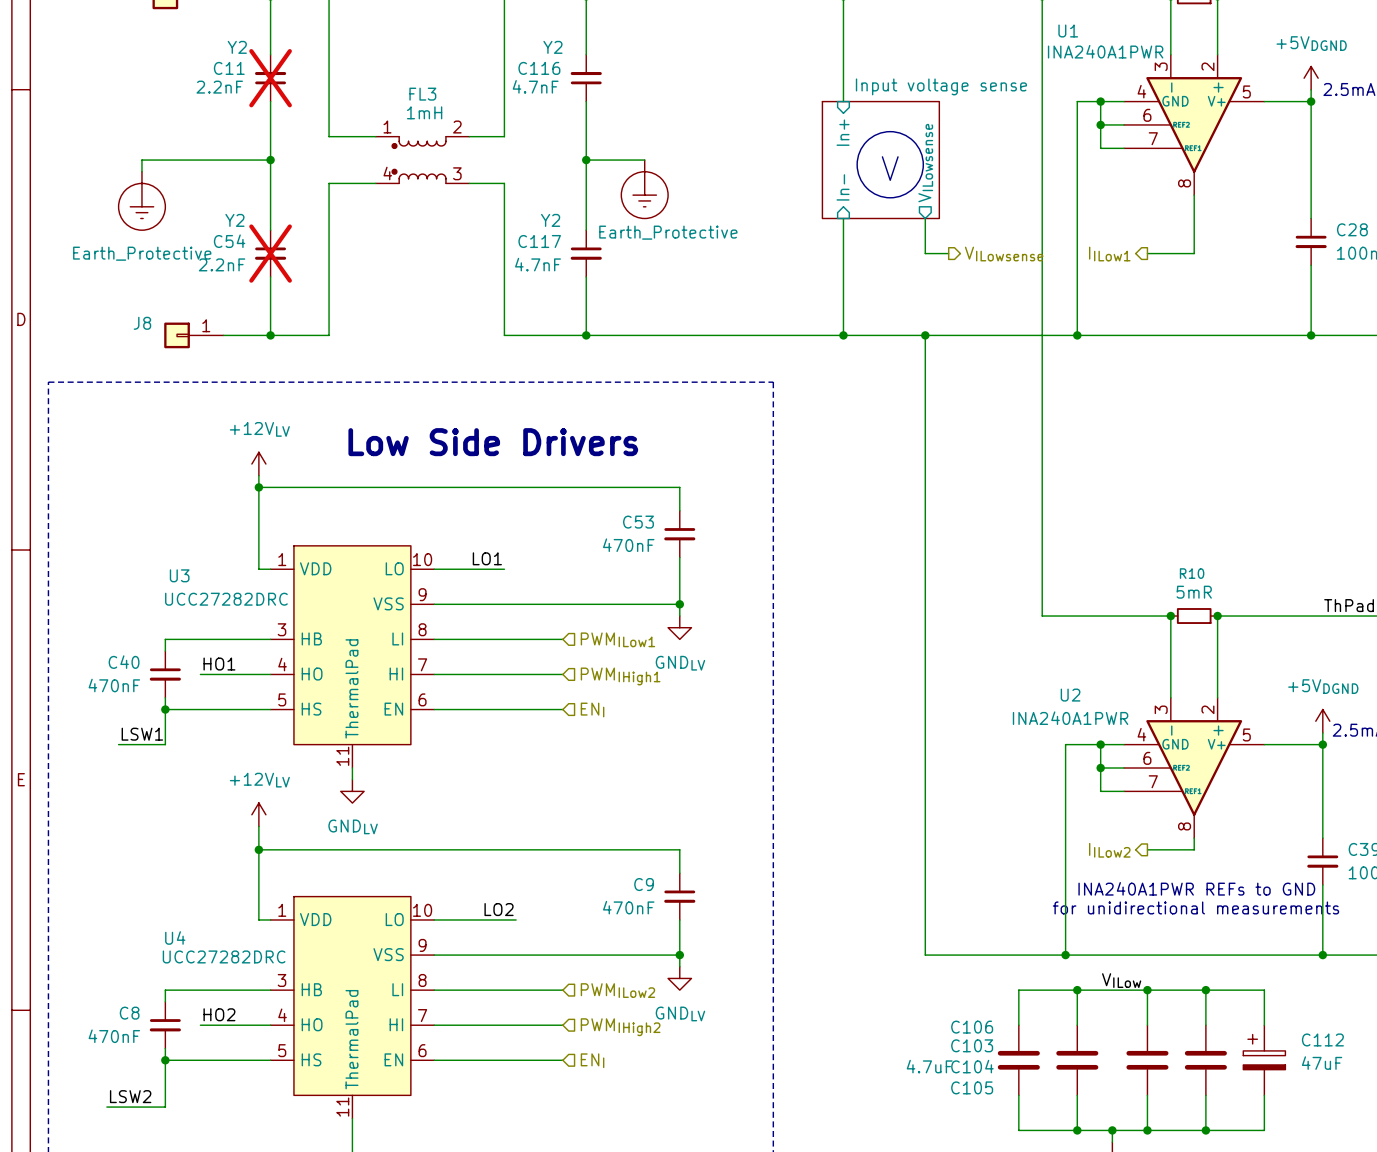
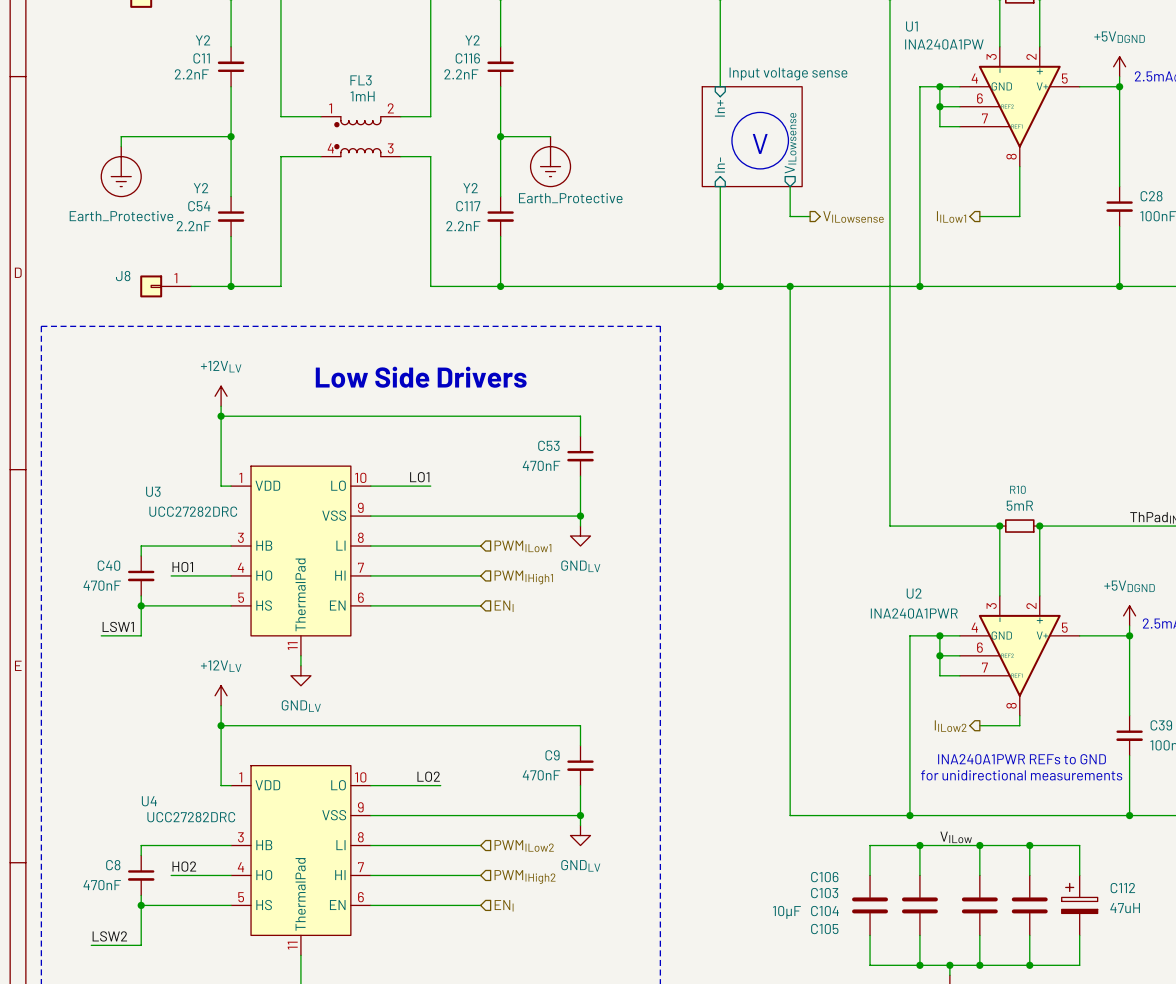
U1 value: INA240A1PWR (1105, 51) -> INA240A1PW (944, 44)
C11 do-not-place cross: (270, 78) -> none
C116 value: 4.7nF (535, 86) -> 2.2nF (461, 74)
C54 do-not-place cross: (270, 253) -> none
C117 value: 4.7nF (538, 264) -> 2.2nF (463, 226)
C112 value: 47uF (1322, 1063) -> 47uH (1125, 908)
C103 value: 4.7uF (929, 1066) -> 10µF (786, 912)

